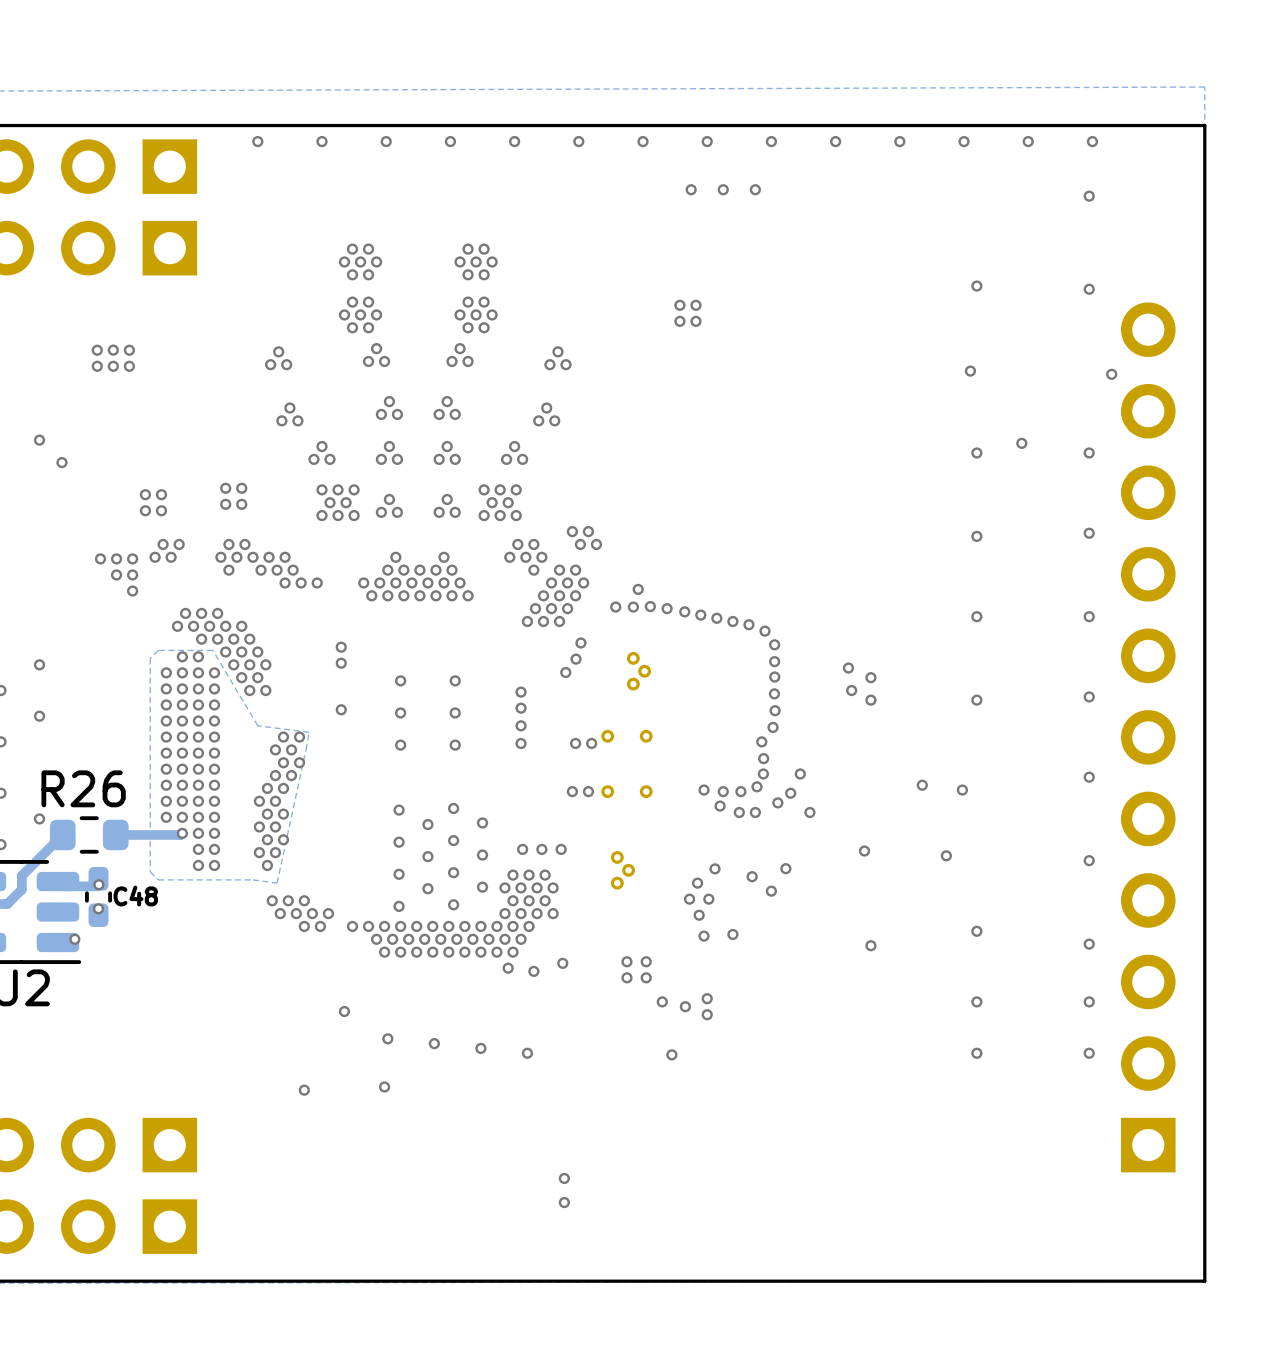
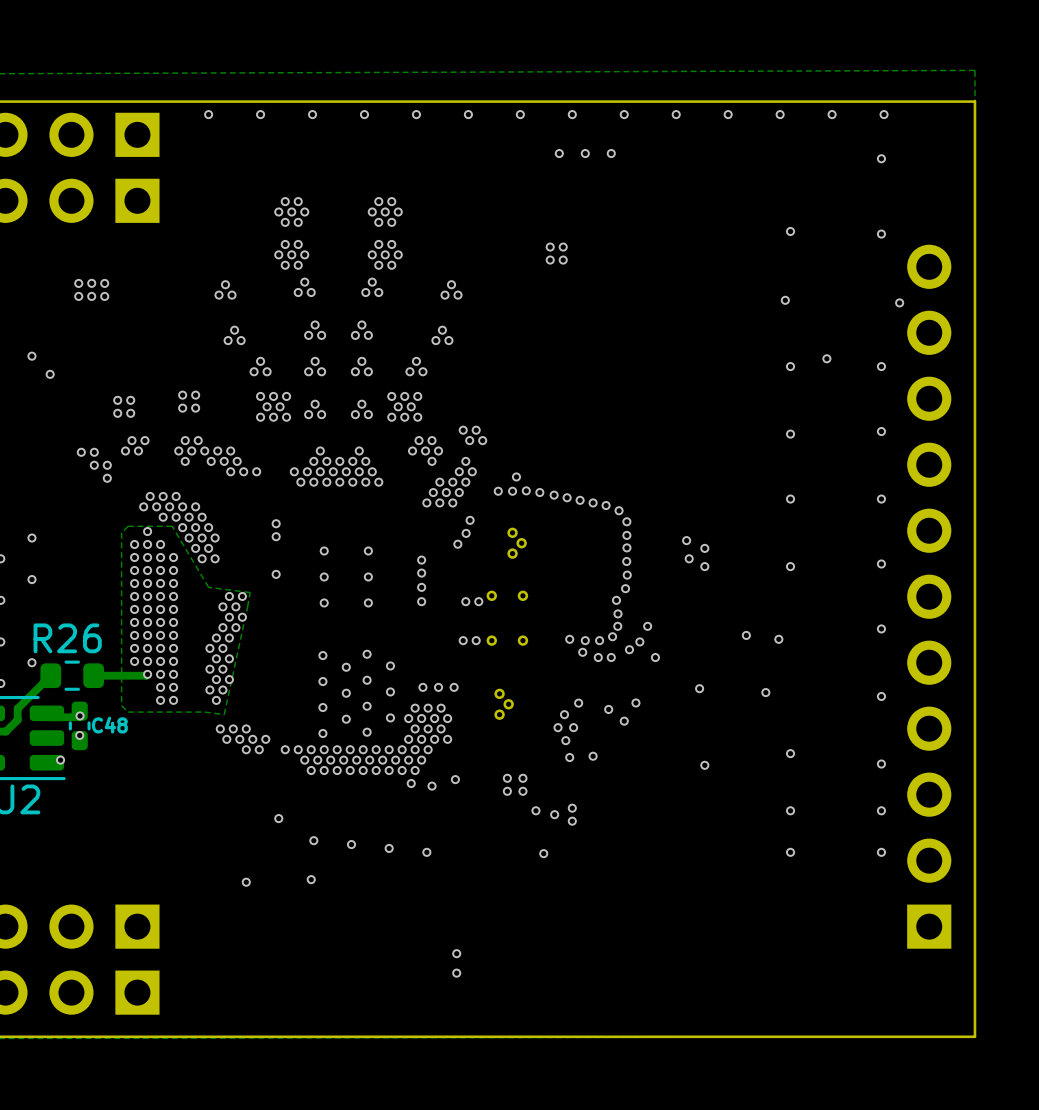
via: (132, 558) -> none
via: (559, 570) -> none
via: (551, 582) -> none
via: (198, 656) -> none
via: (214, 672) -> none

